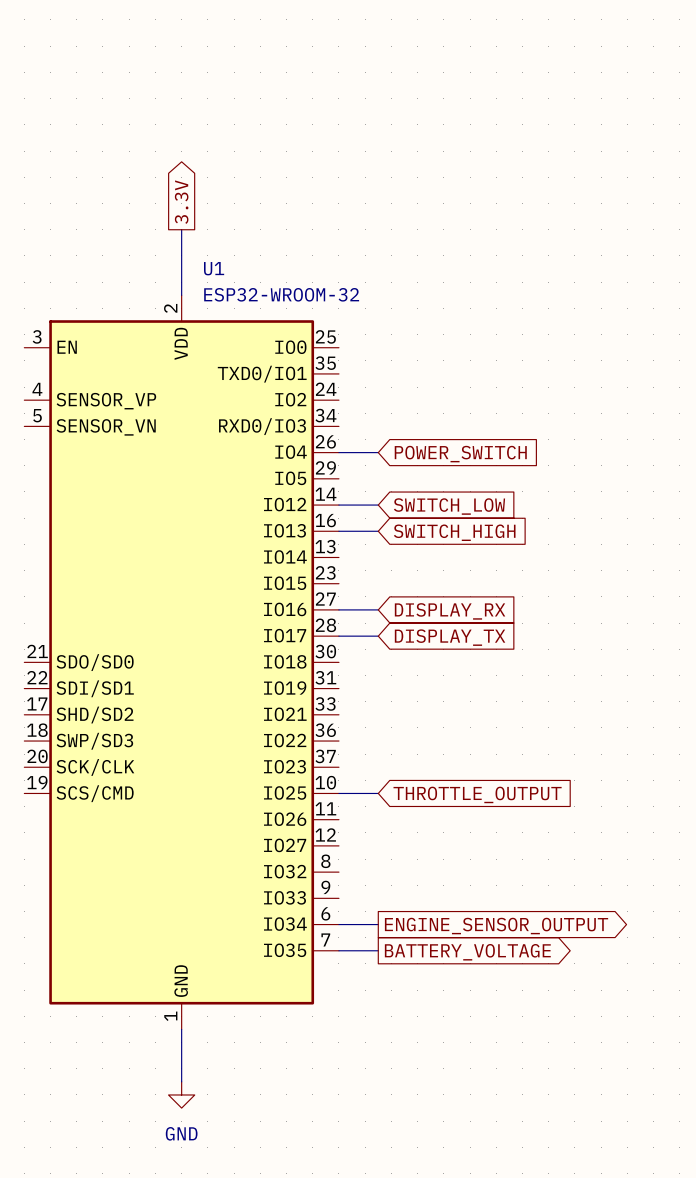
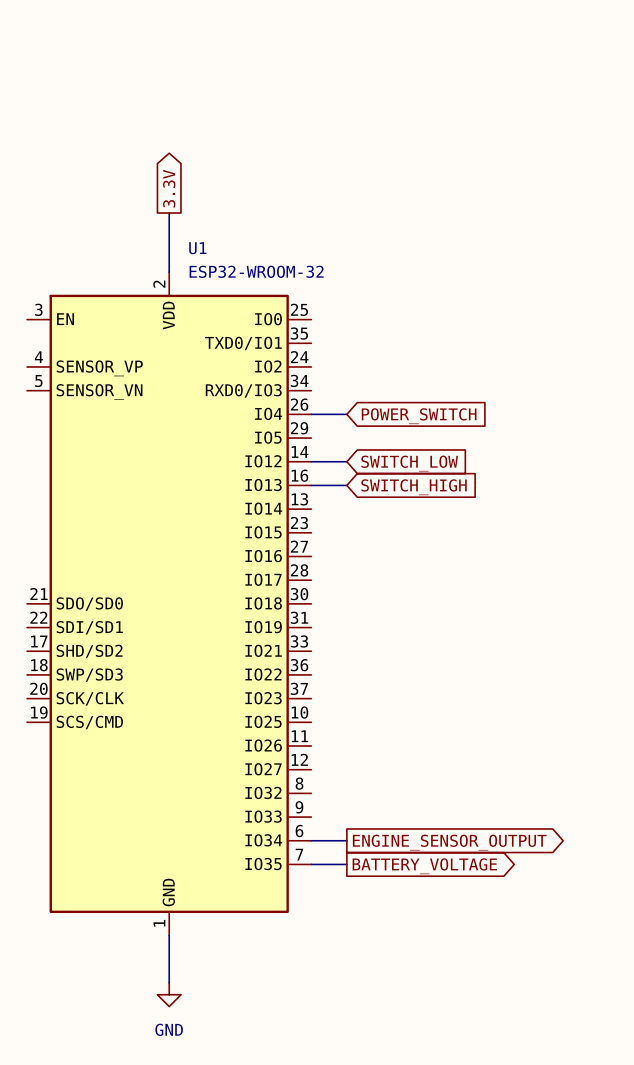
wire: (338, 609) (378, 609) -> none
global label: DISPLAY_RX (450, 611) -> none
wire: (338, 636) (378, 636) -> none
global label: DISPLAY_TX (450, 637) -> none
wire: (338, 793) (378, 793) -> none
global label: THROTTLE_OUTPUT (477, 794) -> none

